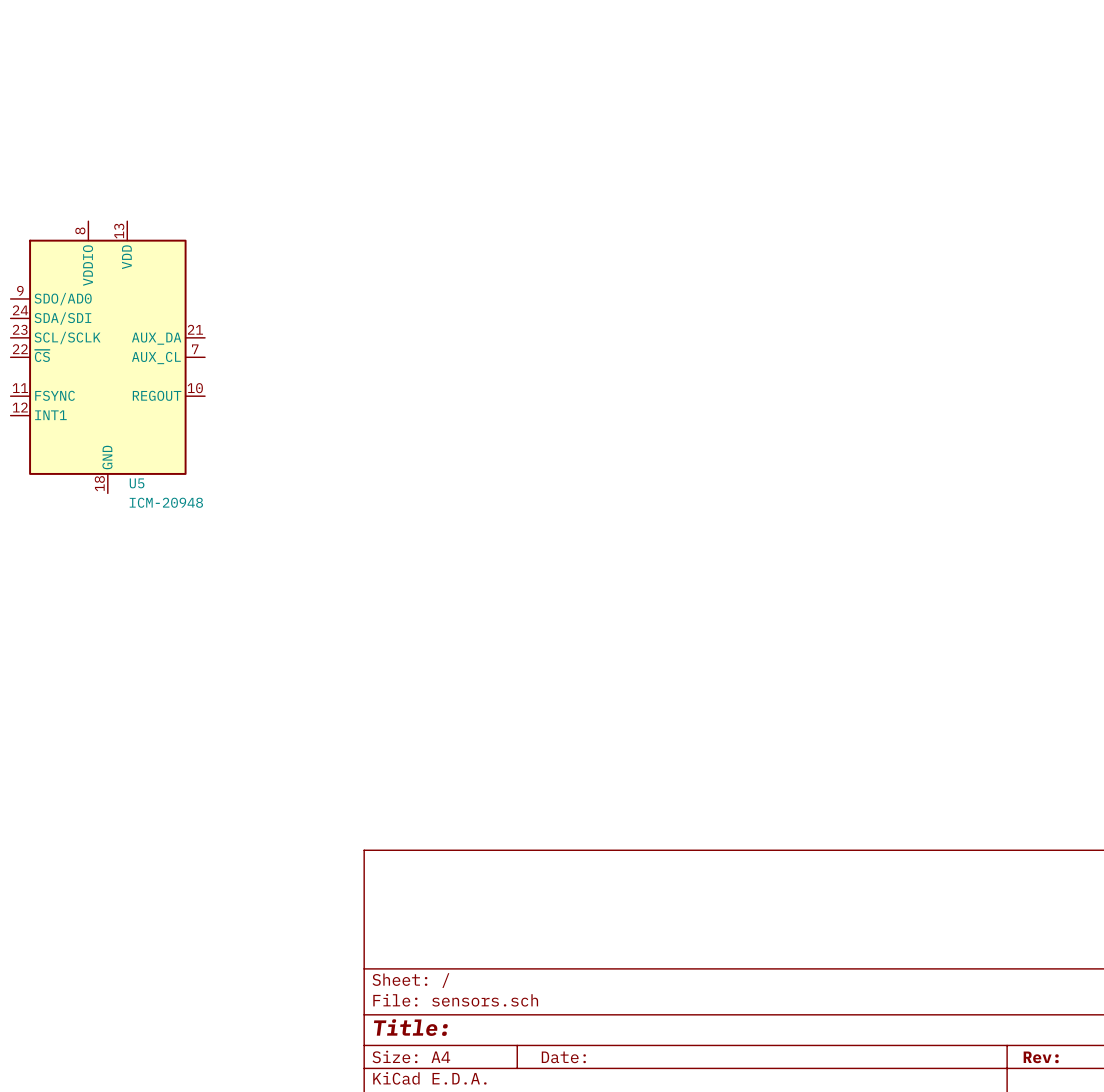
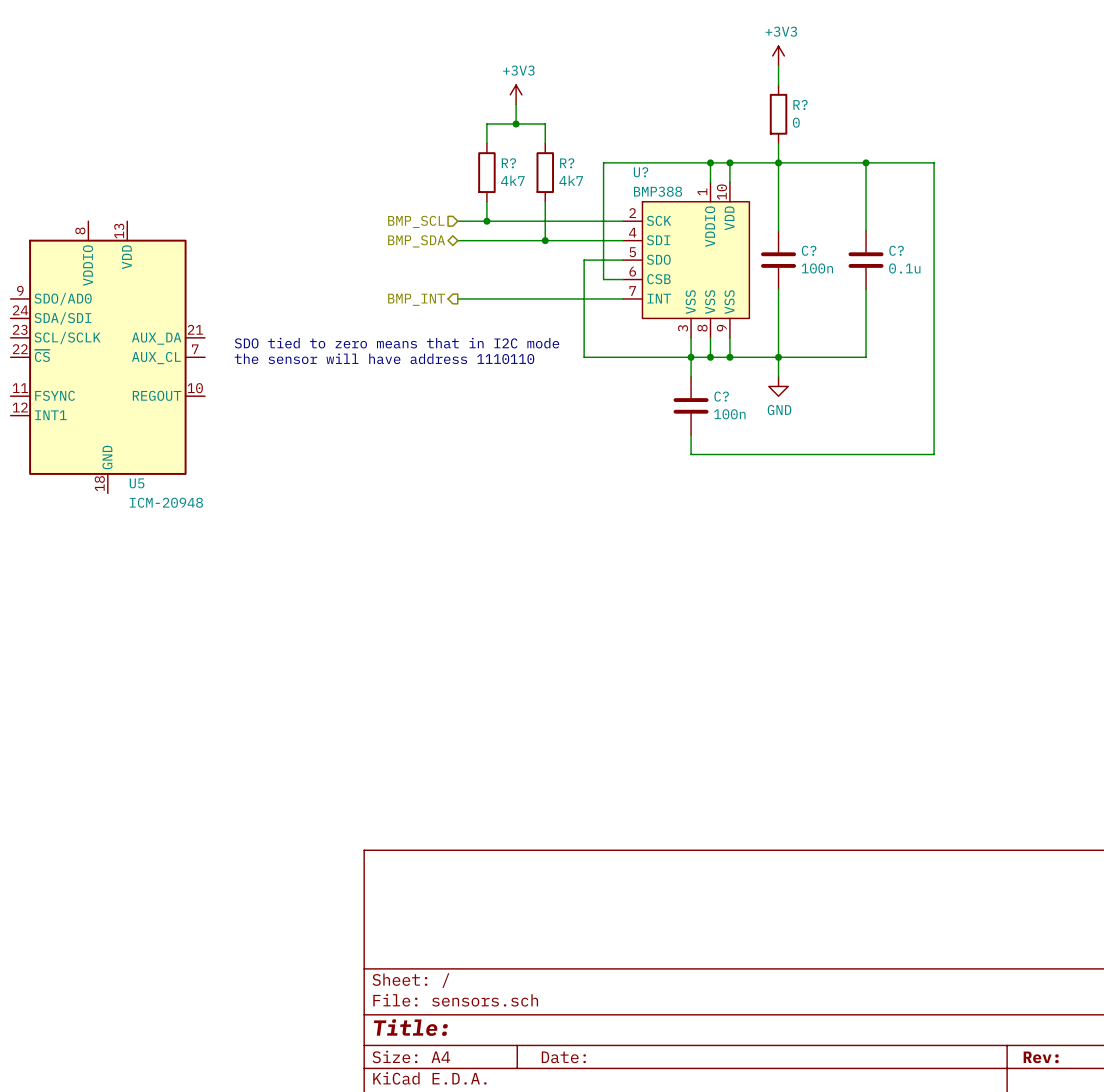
power symbol: none -> +3V3 (778, 55)
wire: none -> (778, 65) (778, 85)
power symbol: none -> +3V3 (516, 94)
wire: none -> (516, 104) (516, 124)
R?: none -> 0 (778, 114)
junction: none -> (516, 124)
wire: none -> (486, 143) (486, 124) (545, 124) (545, 143)
wire: none -> (778, 143) (778, 230)
wire: none -> (710, 162) (710, 182)
junction: none -> (710, 162)
wire: none -> (729, 162) (729, 182)
junction: none -> (729, 162)
junction: none -> (778, 162)
wire: none -> (866, 162) (866, 230)
junction: none -> (866, 162)
R?: none -> 4k7 (486, 172)
R?: none -> 4k7 (545, 172)
wire: none -> (486, 201) (486, 221)
wire: none -> (545, 201) (545, 240)
hierarchical label: none -> BMP_SCL (416, 221)
wire: none -> (457, 221) (623, 221)
junction: none -> (486, 221)
wire: none -> (457, 240) (623, 240)
junction: none -> (545, 240)
hierarchical label: none -> BMP_SDA (416, 241)
wire: none -> (623, 260) (584, 260) (584, 357) (866, 357) (866, 289)
U?: none -> BMP388 (686, 260)
C?: none -> 100n (778, 260)
C?: none -> 0.1u (866, 260)
wire: none -> (623, 279) (603, 279) (603, 162) (934, 162) (934, 454) (691, 454) (691, 435)
wire: none -> (778, 289) (778, 376)
wire: none -> (457, 298) (623, 298)
hierarchical label: none -> BMP_INT (416, 299)
wire: none -> (691, 337) (691, 376)
wire: none -> (710, 337) (710, 357)
wire: none -> (729, 337) (729, 357)
text: none -> SDO tied to zero means that in I2C mode (396, 343)
junction: none -> (691, 357)
junction: none -> (710, 357)
junction: none -> (729, 357)
junction: none -> (778, 357)
text: none -> the sensor will have address 1110110 (384, 358)
power symbol: none -> GND (778, 386)
C?: none -> 100n (691, 405)

